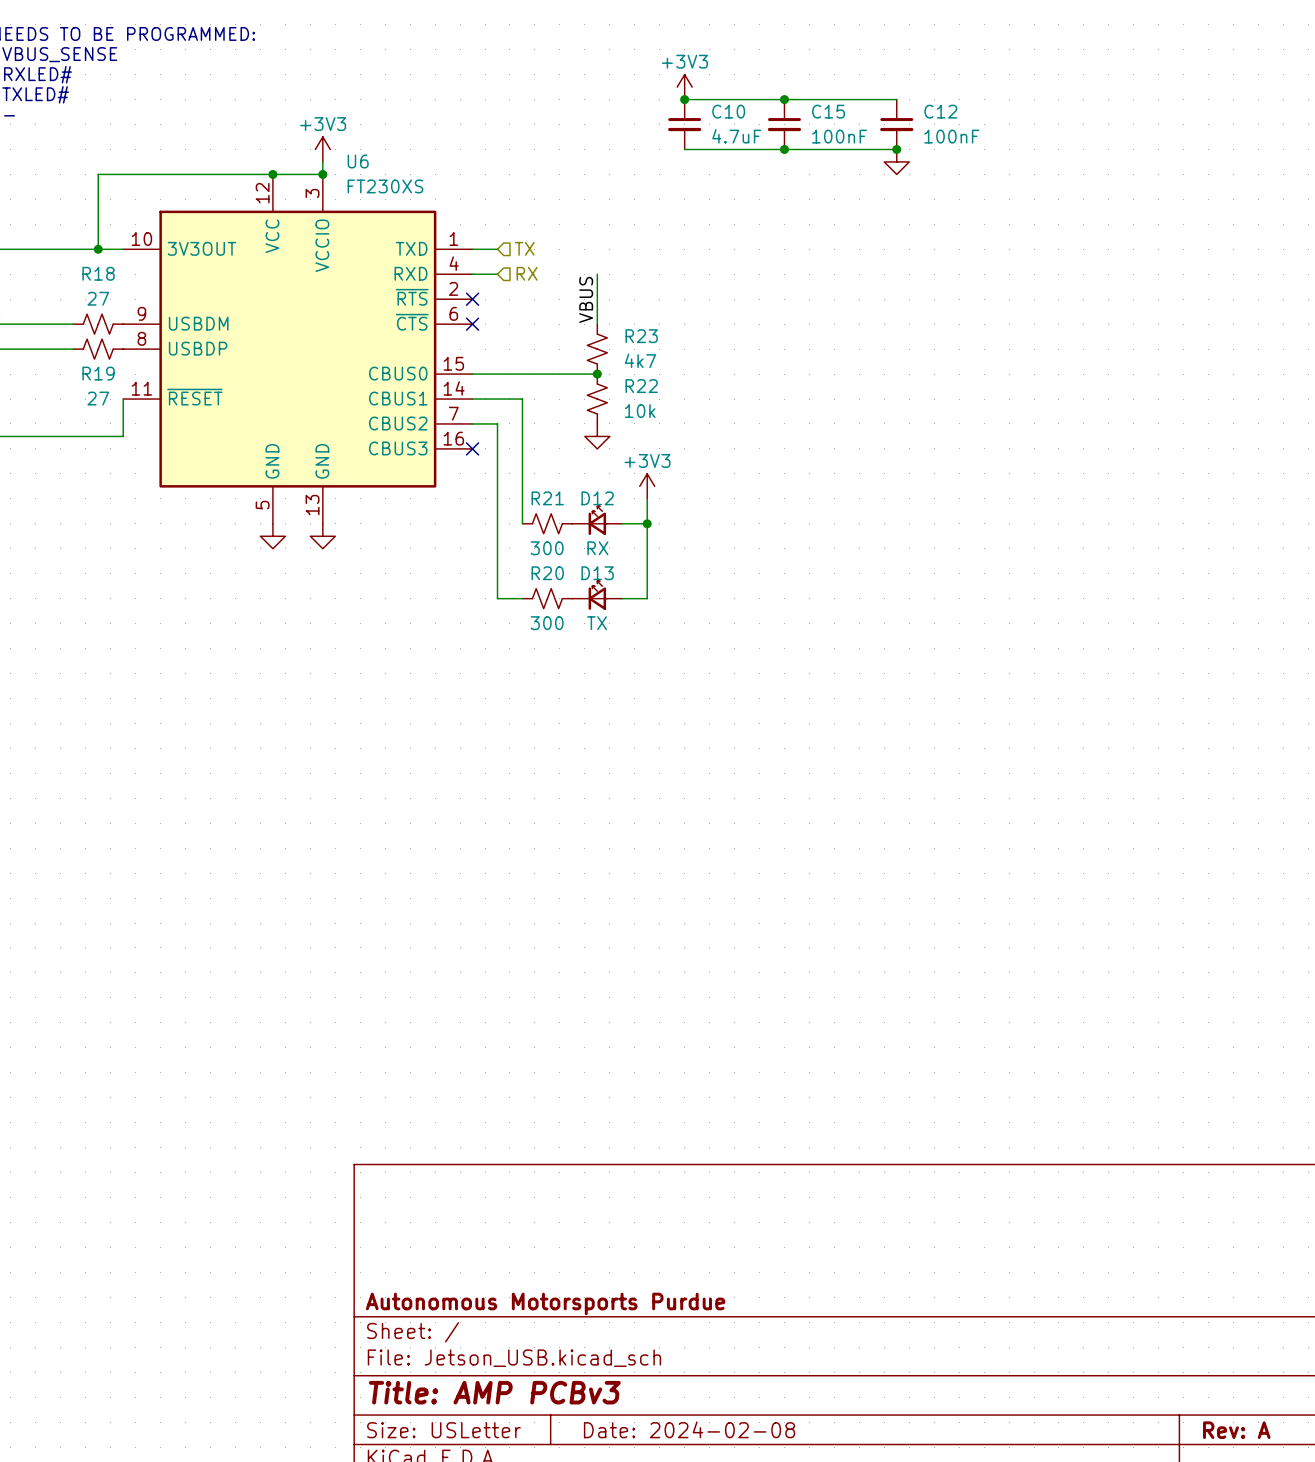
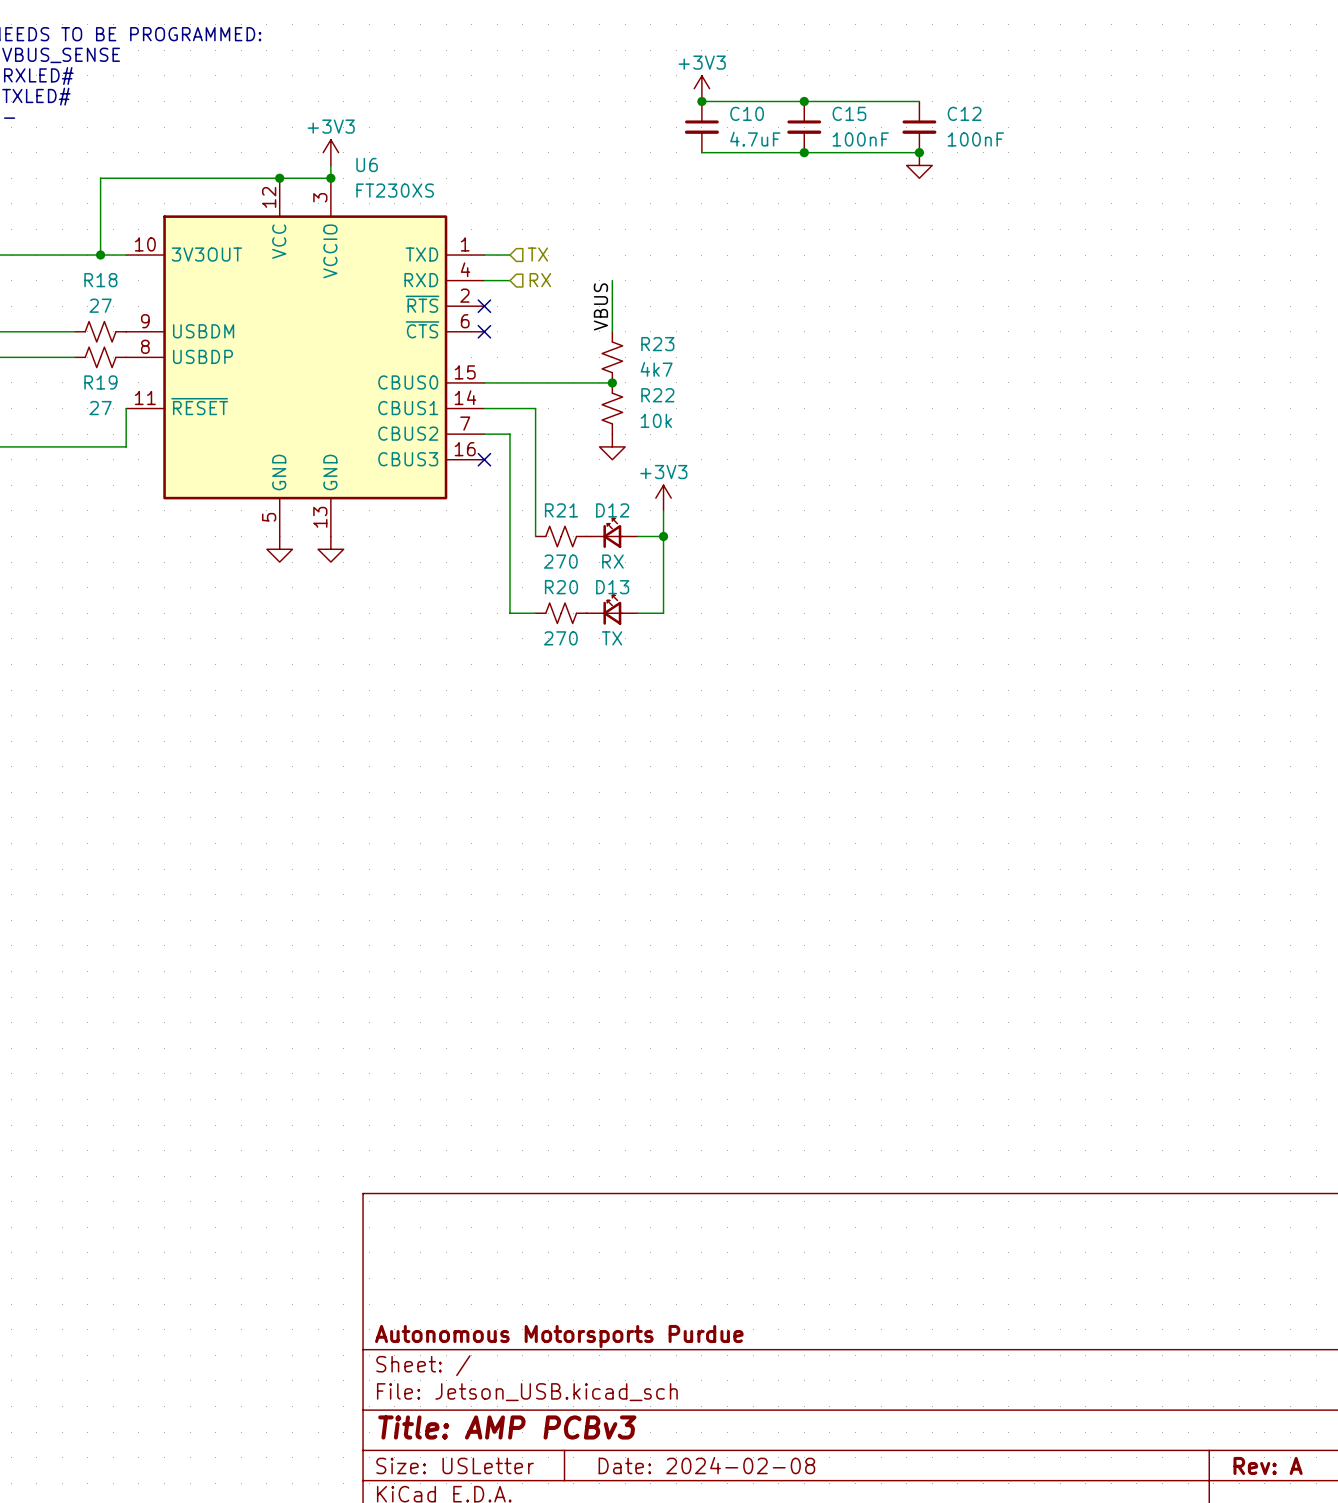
R21 value: 300 (547, 548) -> 270 (560, 561)
R20 value: 300 (547, 623) -> 270 (560, 638)

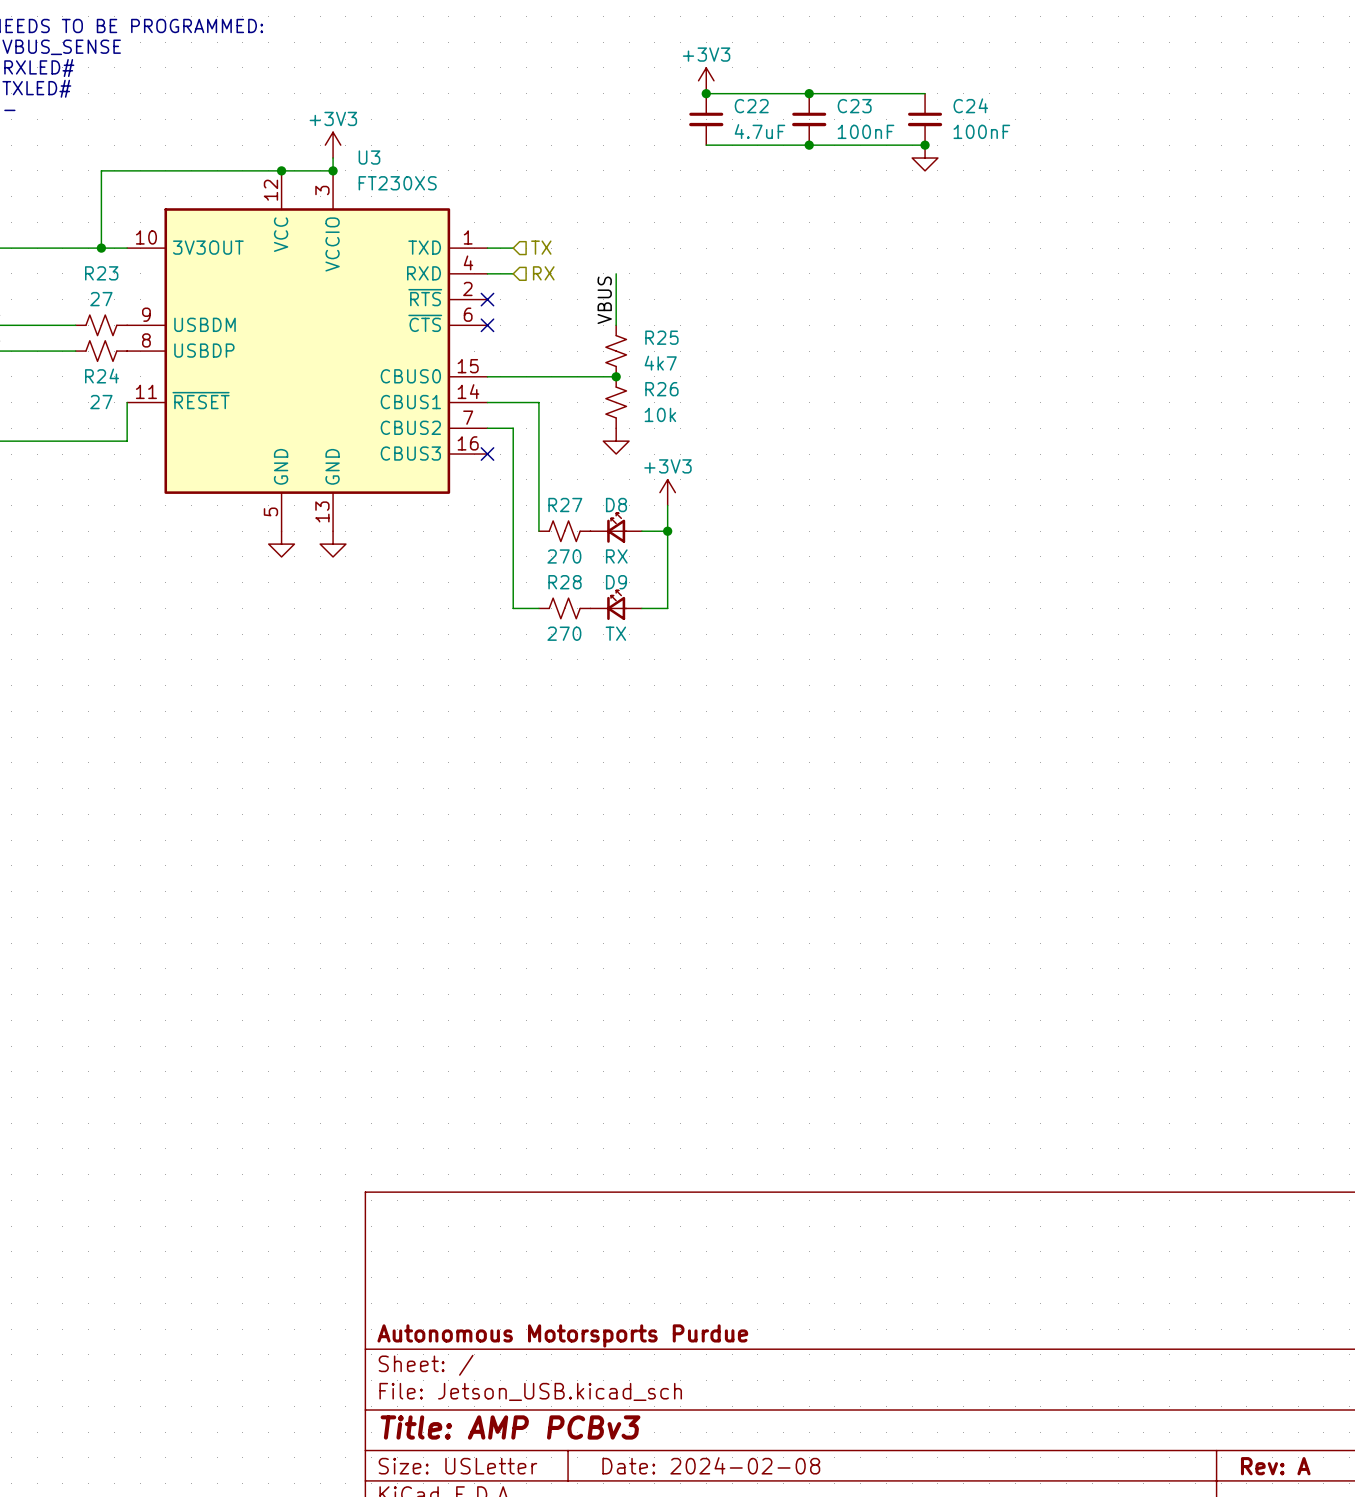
C10 name: C10 (747, 113) -> C22 (751, 106)
C15 name: C15 (849, 113) -> C23 (854, 106)
C12 name: C12 (964, 113) -> C24 (970, 105)
U6 name: U6 (367, 164) -> U3 (369, 157)
R18 name: R18 (100, 280) -> R23 (101, 273)
R23 name: R23 (657, 344) -> R25 (661, 337)
R19 name: R19 (100, 382) -> R24 (102, 376)
R22 name: R22 (657, 395) -> R26 (661, 389)
R21 name: R21 (561, 510) -> R27 (565, 505)
D12 name: D12 (612, 510) -> D8 (616, 505)
R20 name: R20 (561, 587) -> R28 (565, 582)
D13 name: D13 (612, 587) -> D9 (616, 582)

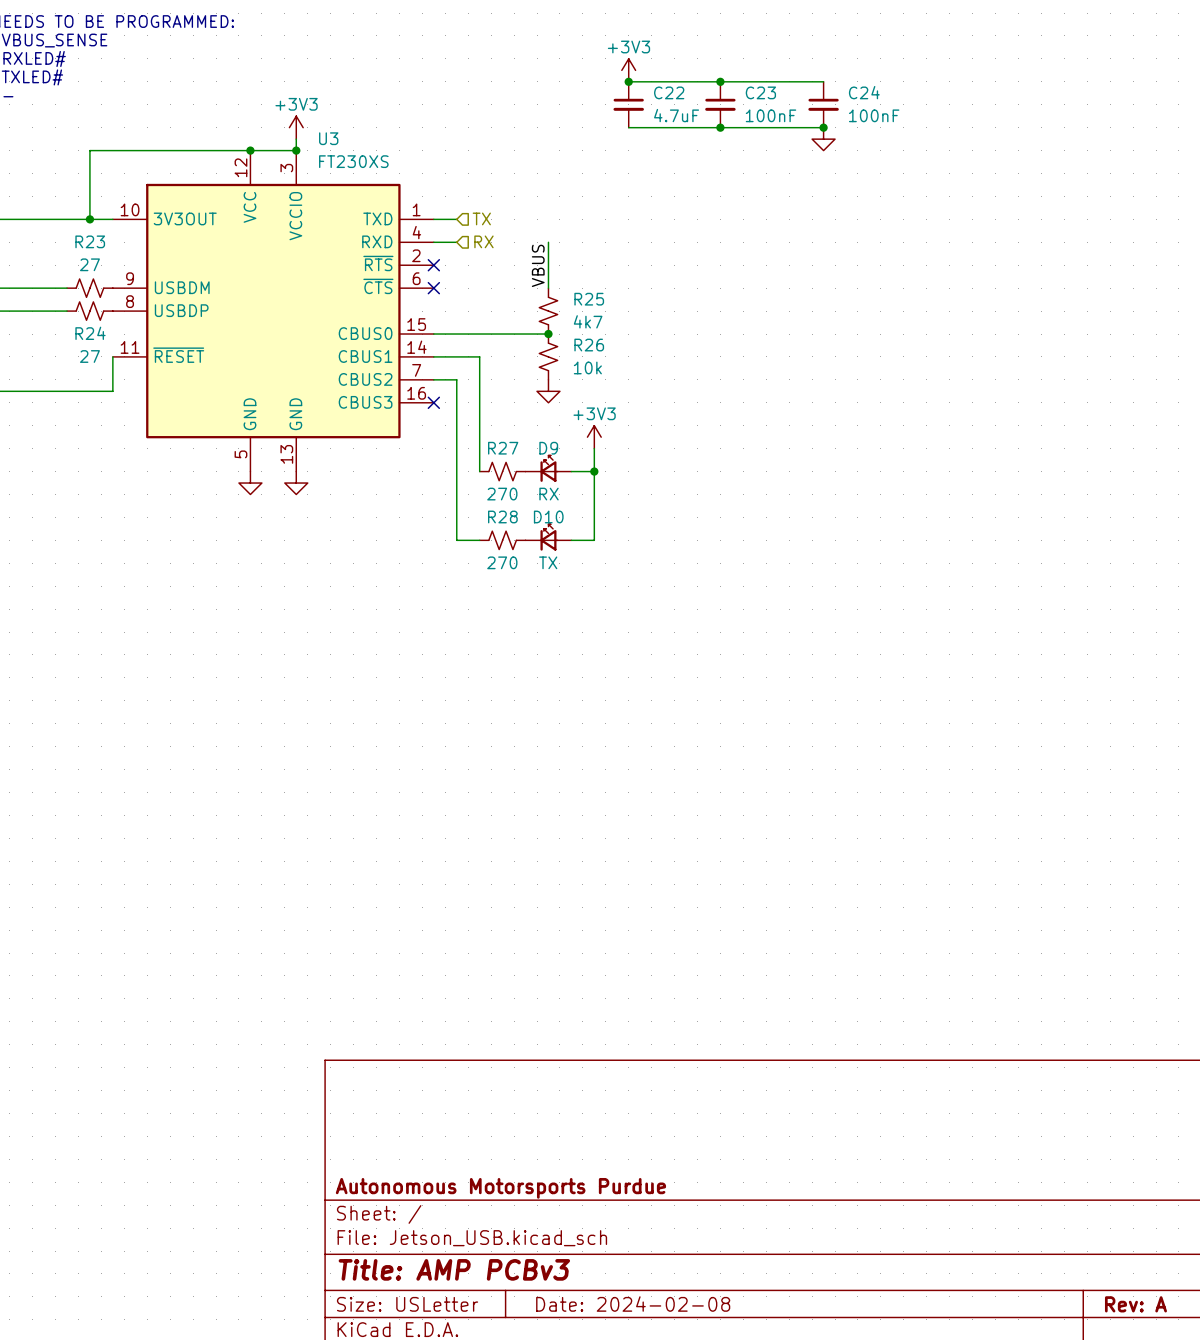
D8 name: D8 (616, 505) -> D9 (548, 448)
D9 name: D9 (616, 582) -> D10 (548, 516)

